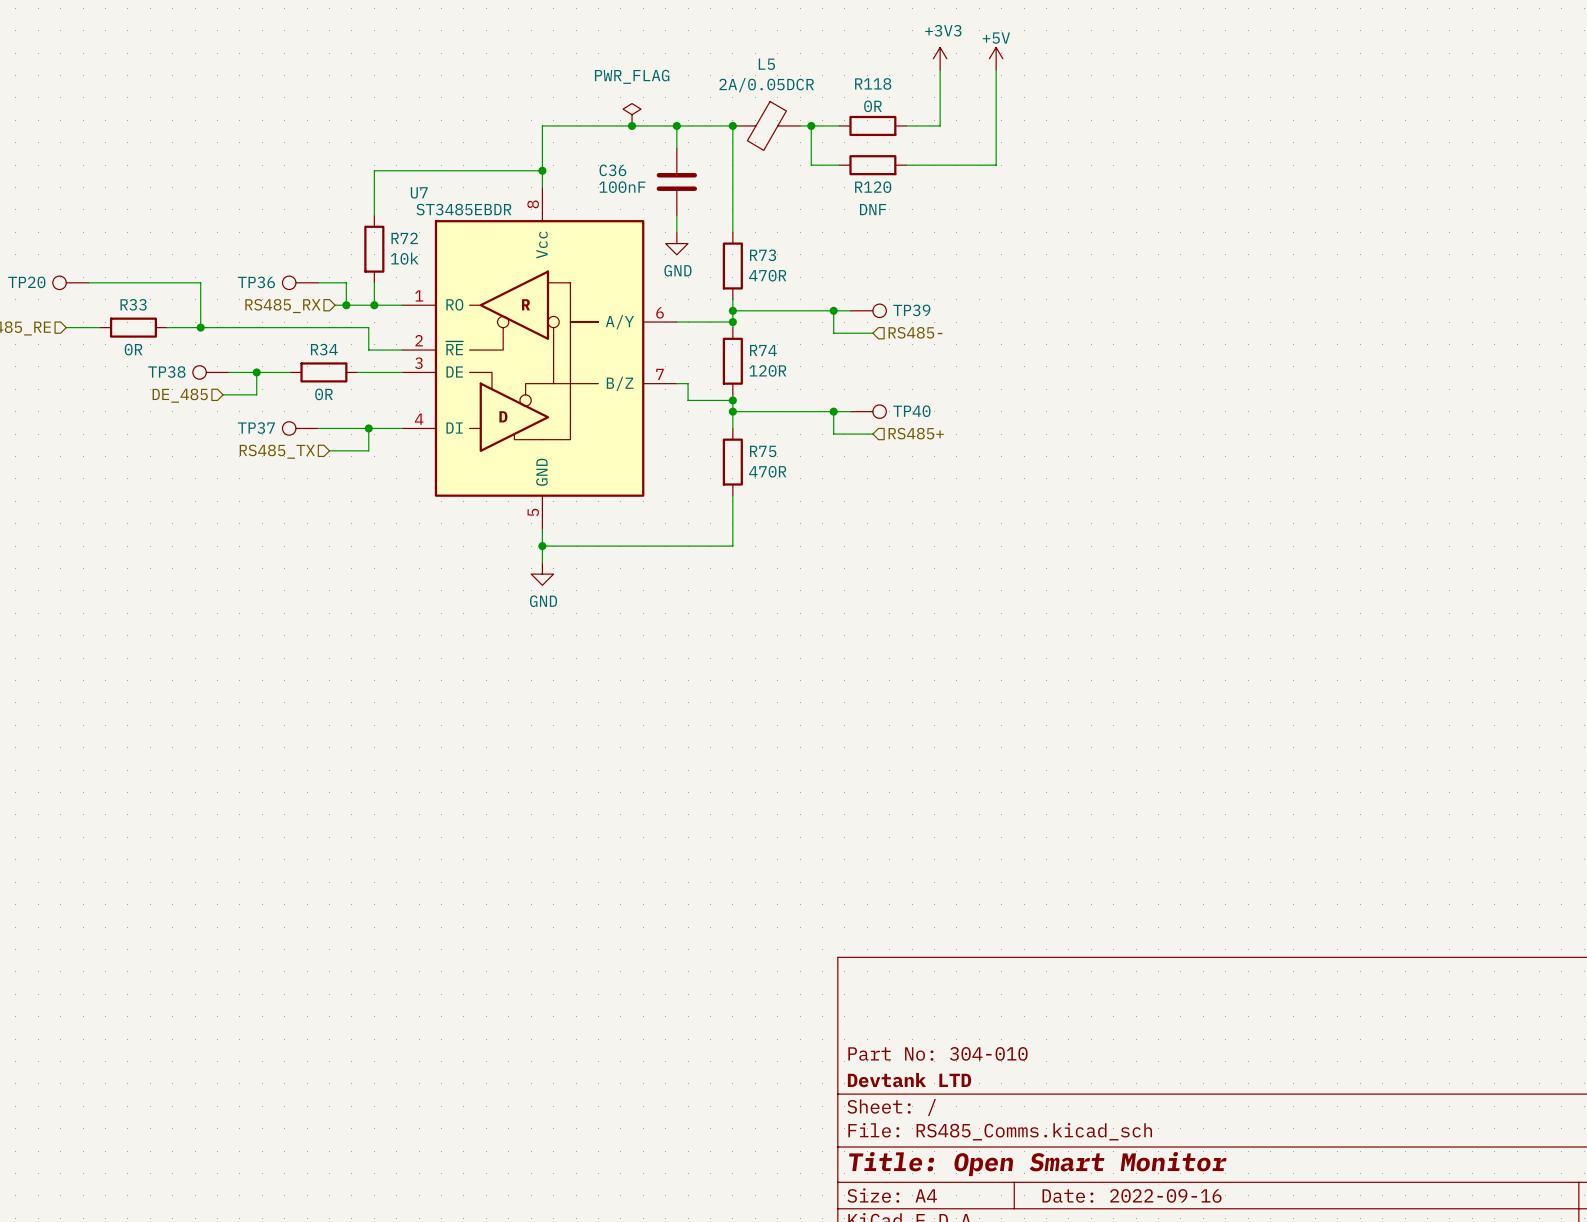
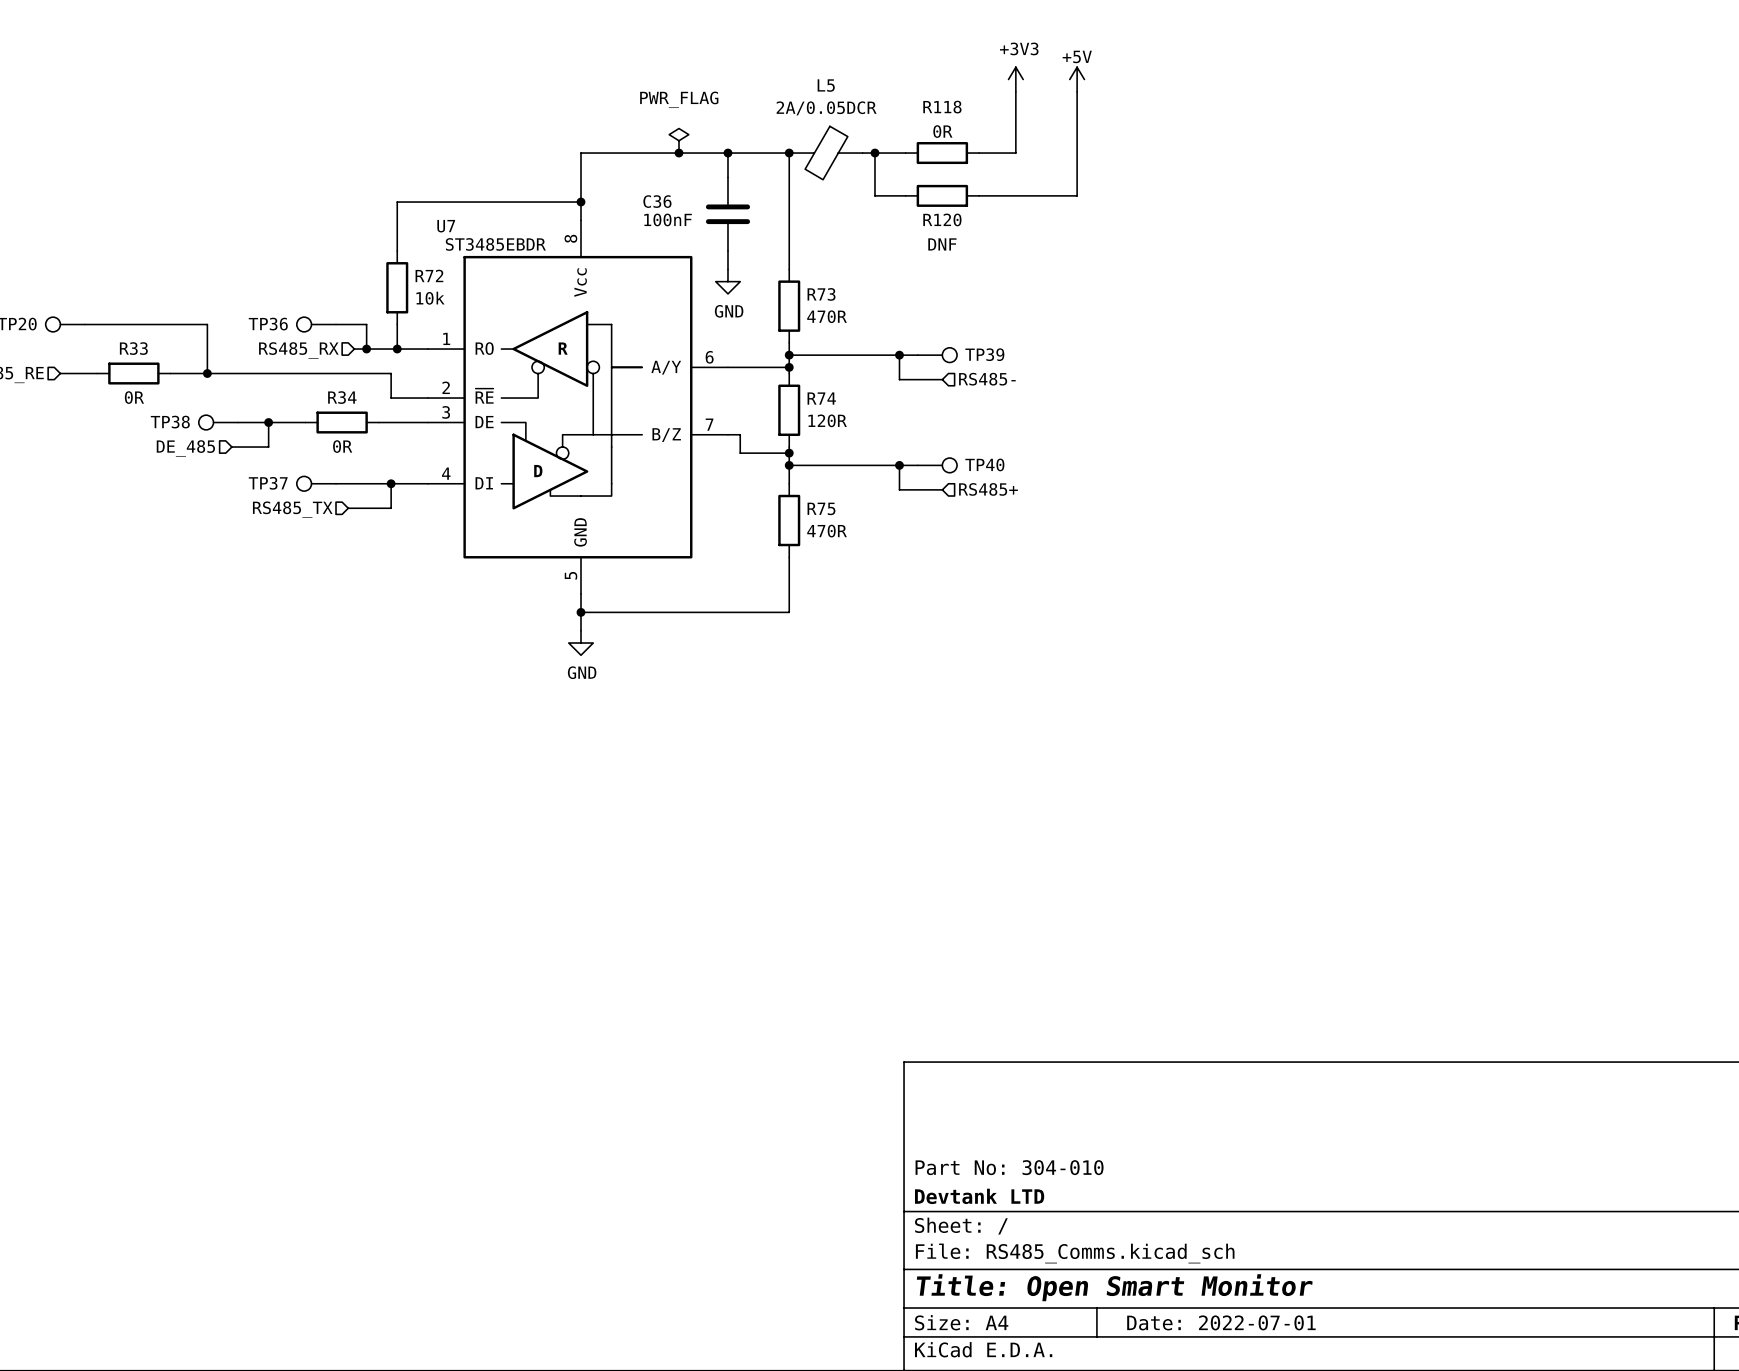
title block: Date: 2022-09-16 (1132, 1195) -> Date: 2022-07-01 (1221, 1322)

